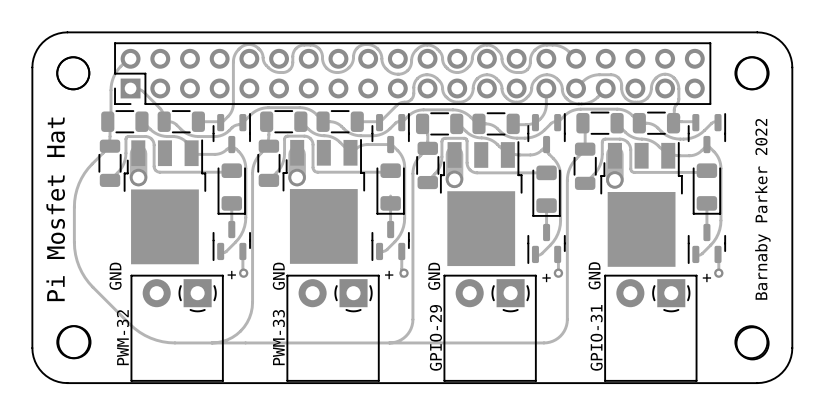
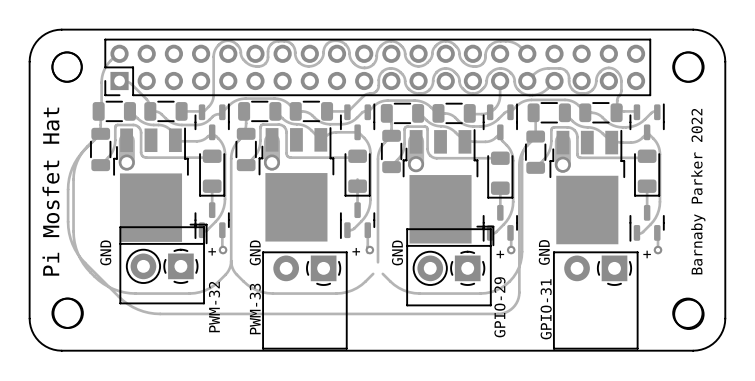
track: none -> (100, 133) (84, 150) (75, 166) (73, 179) (73, 237) (76, 248) (83, 263) (94, 276) (108, 286) (130, 293) (200, 292) (214, 284) (225, 274) (231, 260) (234, 271) (243, 281) (256, 290) (267, 293) (341, 293) (357, 287) (373, 273)
track: none -> (535, 135) (525, 146) (522, 154) (521, 257) (516, 272) (509, 281) (496, 290) (485, 293) (419, 293) (398, 287) (382, 273)
PWM-32 footprint: [130, 274, 224, 382] -> [119, 223, 208, 305]
GPIO-29 footprint: [443, 274, 537, 382] -> [406, 225, 495, 307]
track: (252, 285) (251, 312) (244, 327) (232, 337) (212, 342) -> none
track: (412, 286) (411, 328) (403, 338) (389, 342) -> none
PWM-32 name position: PWM-32 (122, 337) -> PWM-32 (214, 307)
GPIO-29 name position: GPIO-29 (435, 337) -> GPIO-29 (499, 307)

